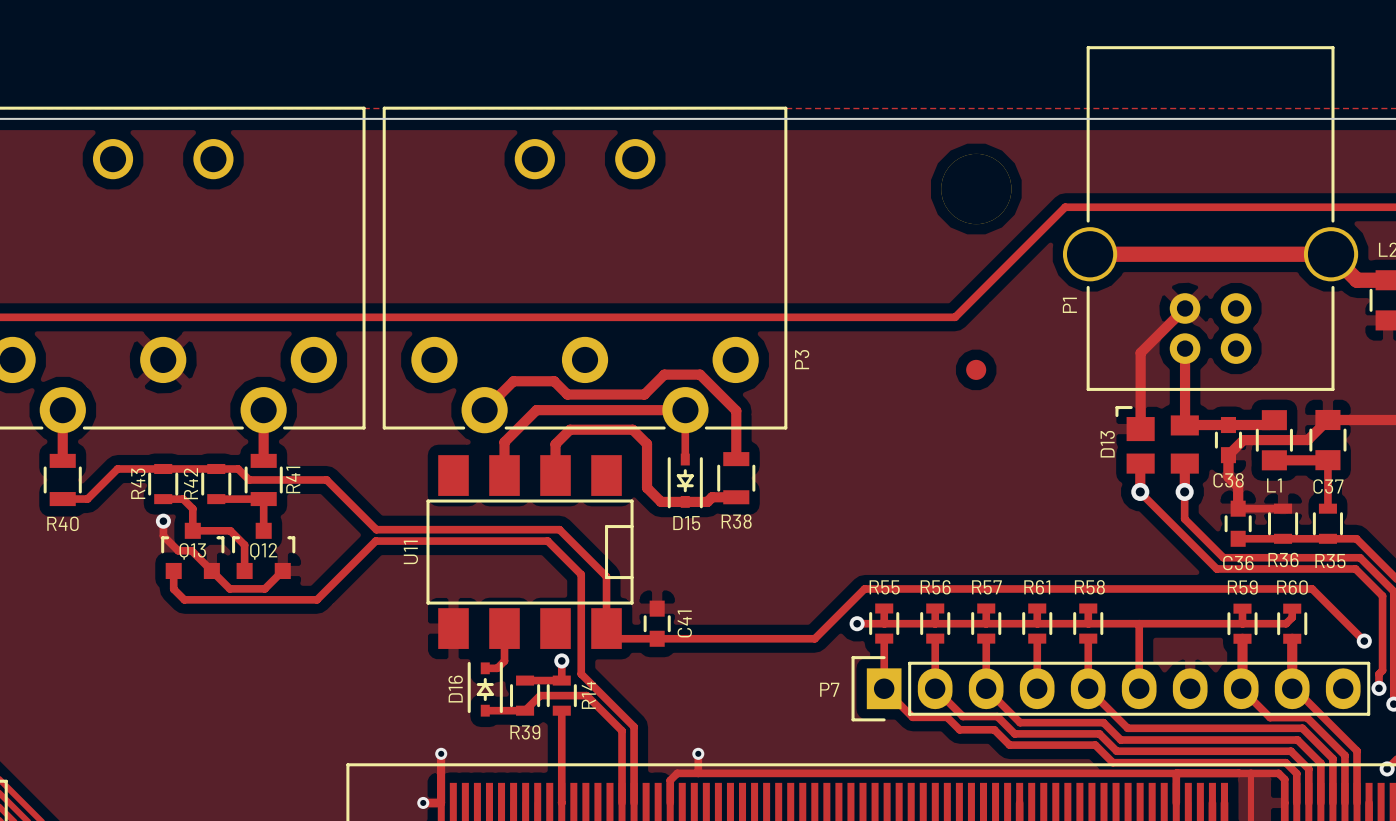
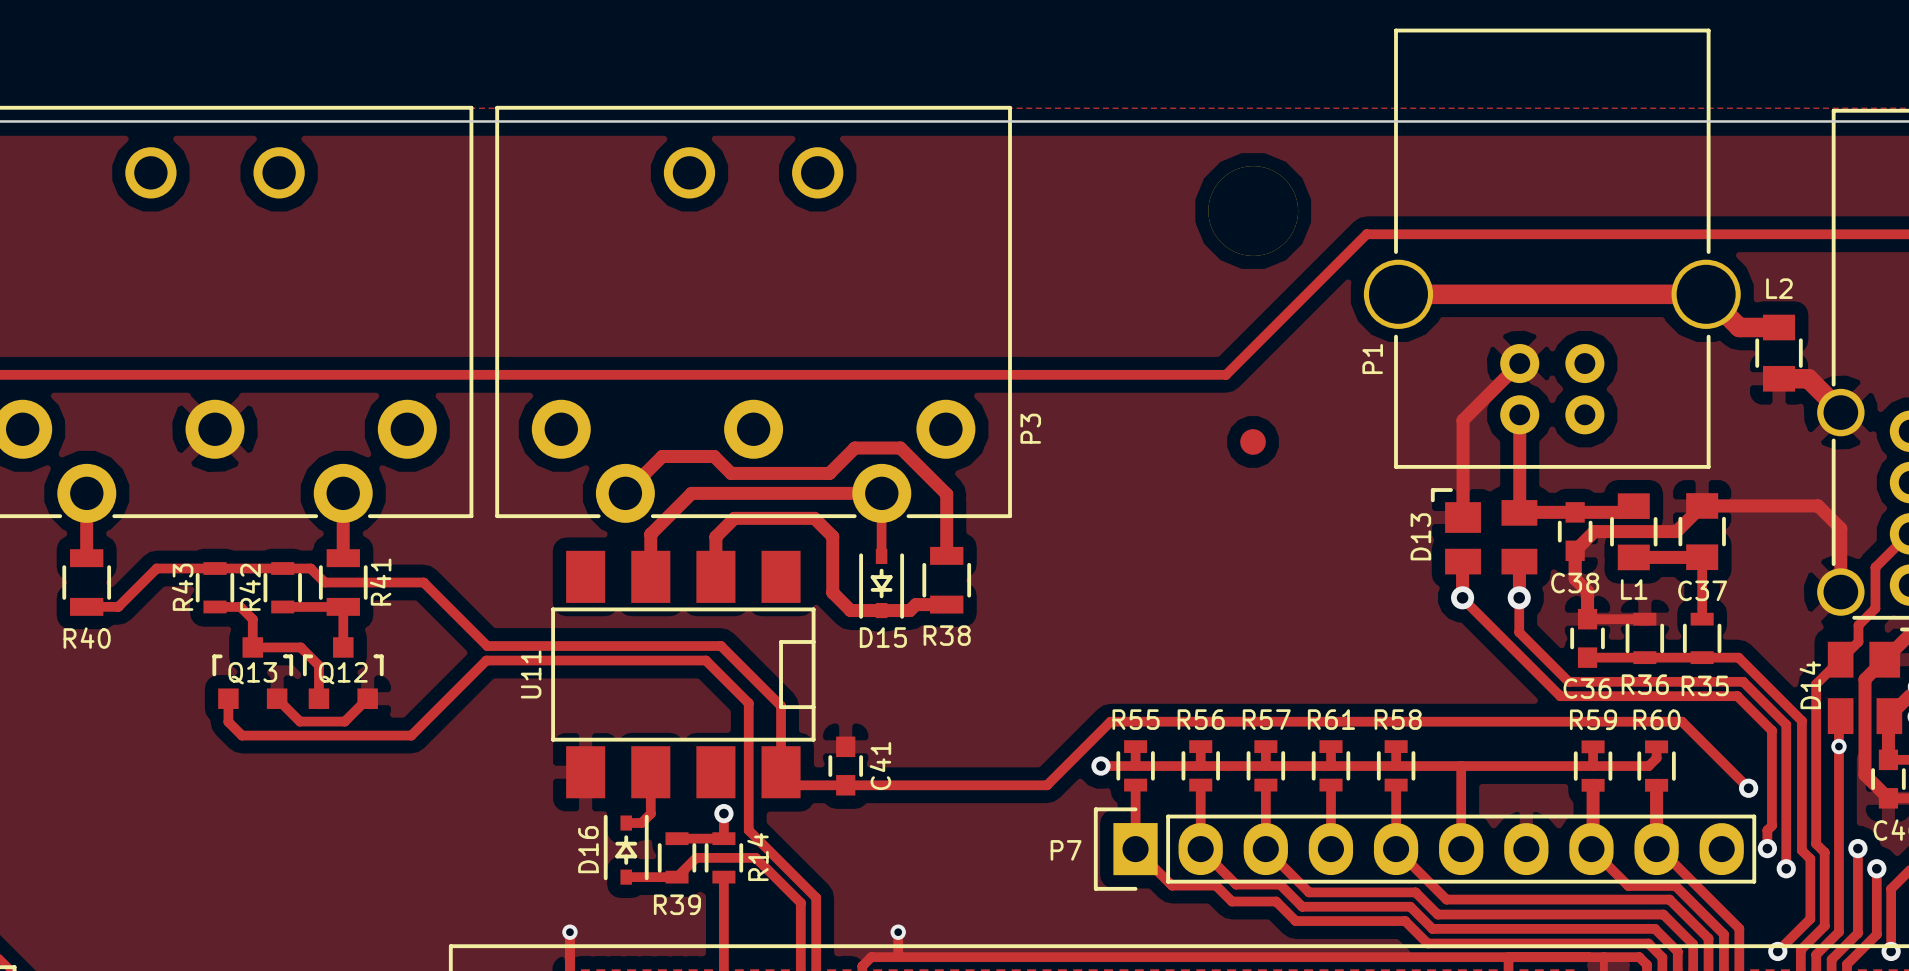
track: (163, 521) (163, 535) (178, 550) (191, 550) (211, 570) -> none
via: (163, 521) -> none

